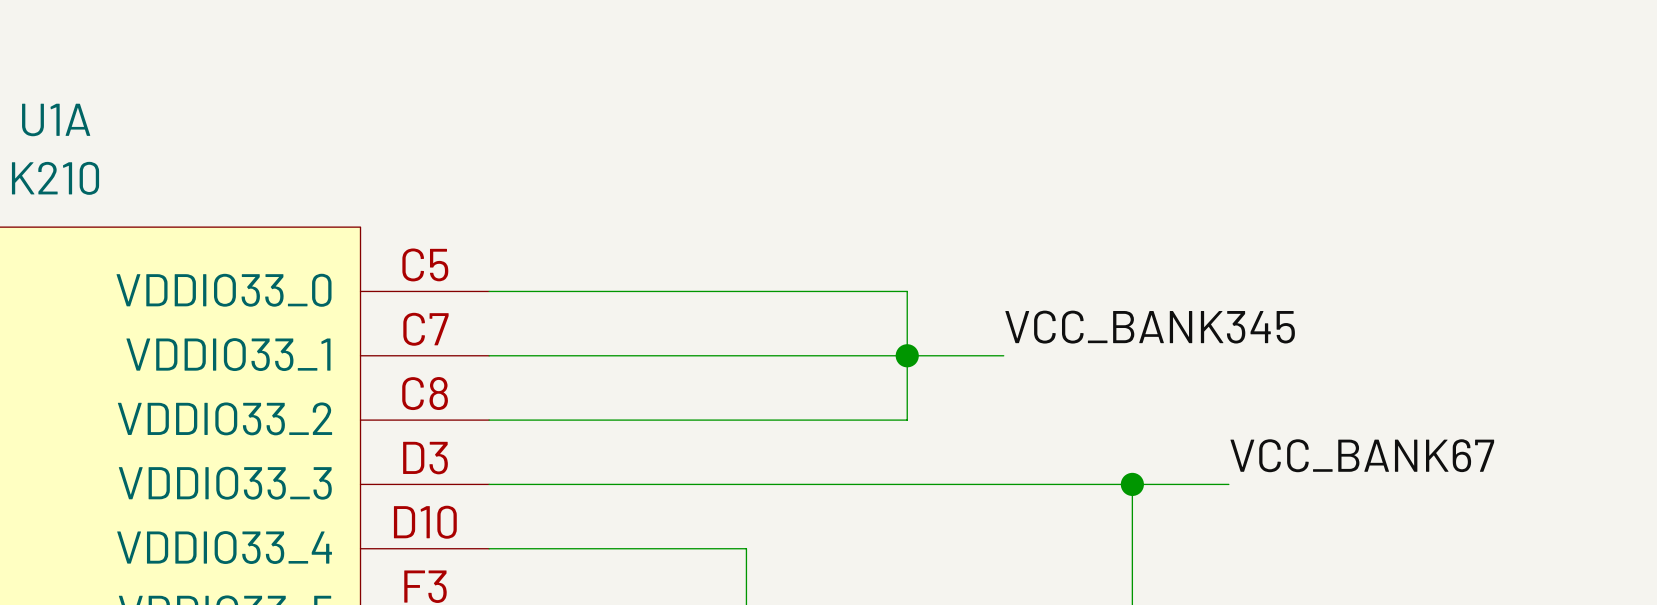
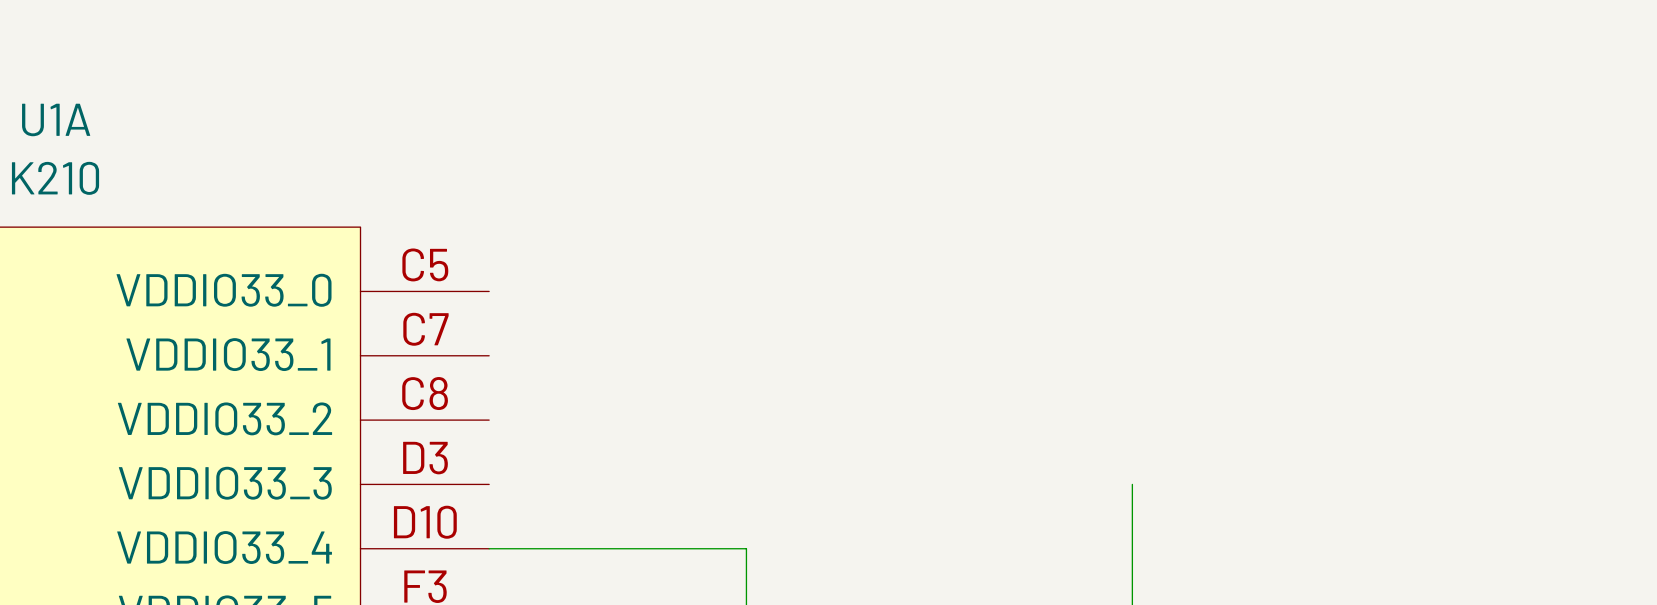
wire: (489, 291) (907, 291) (907, 420) (489, 420) -> none
label: VCC_BANK345 (1150, 327) -> none
wire: (489, 355) (1003, 355) -> none
junction: (907, 355) -> none
label: VCC_BANK67 (1362, 455) -> none
wire: (489, 484) (1228, 484) -> none
junction: (1132, 484) -> none

